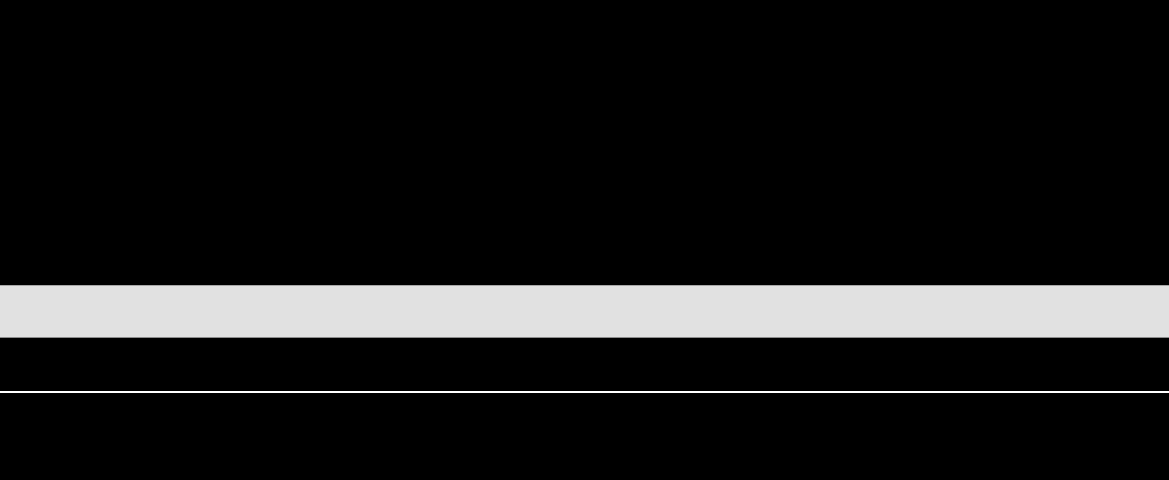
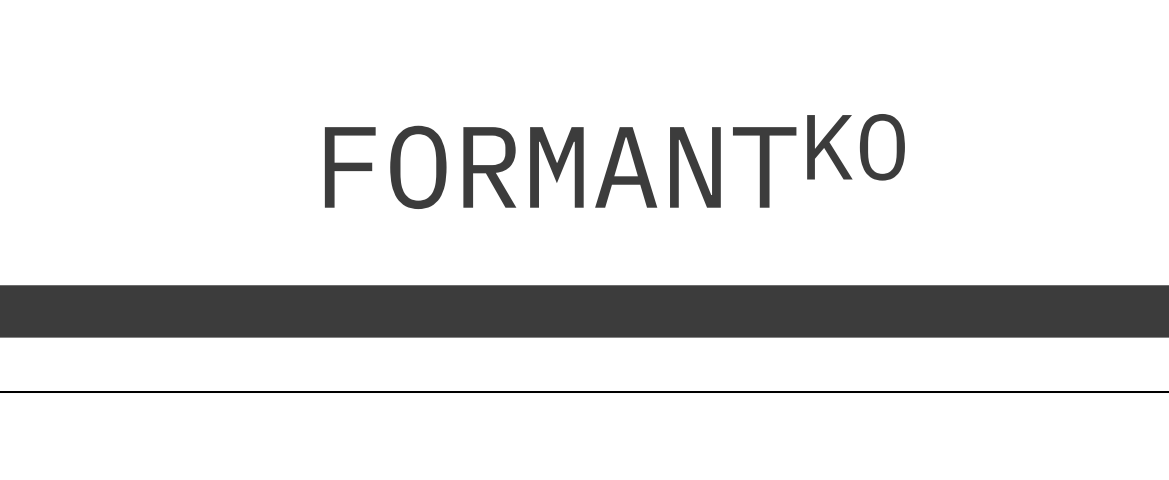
text: none -> FORMANTKO (614, 161)

